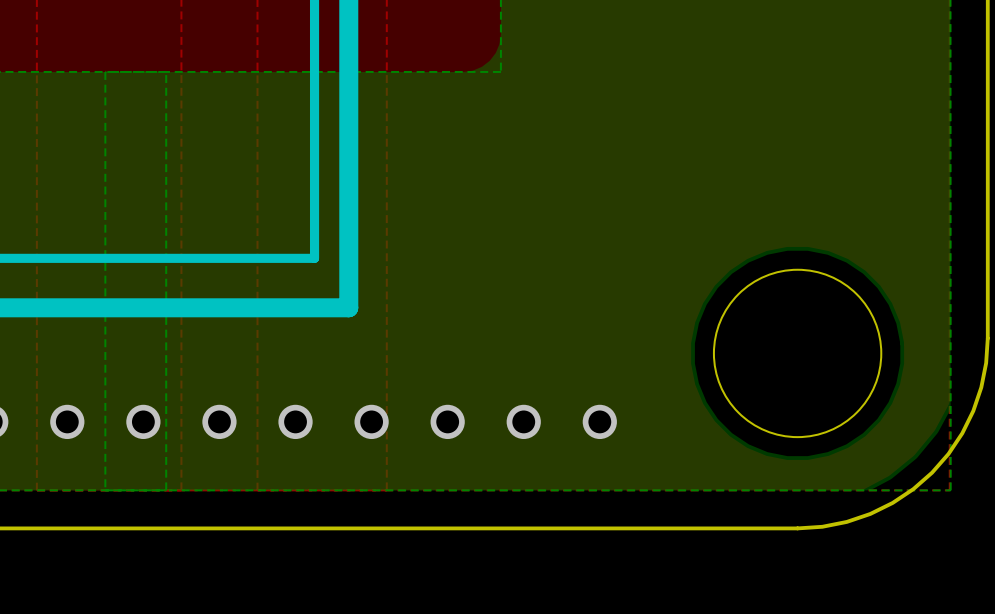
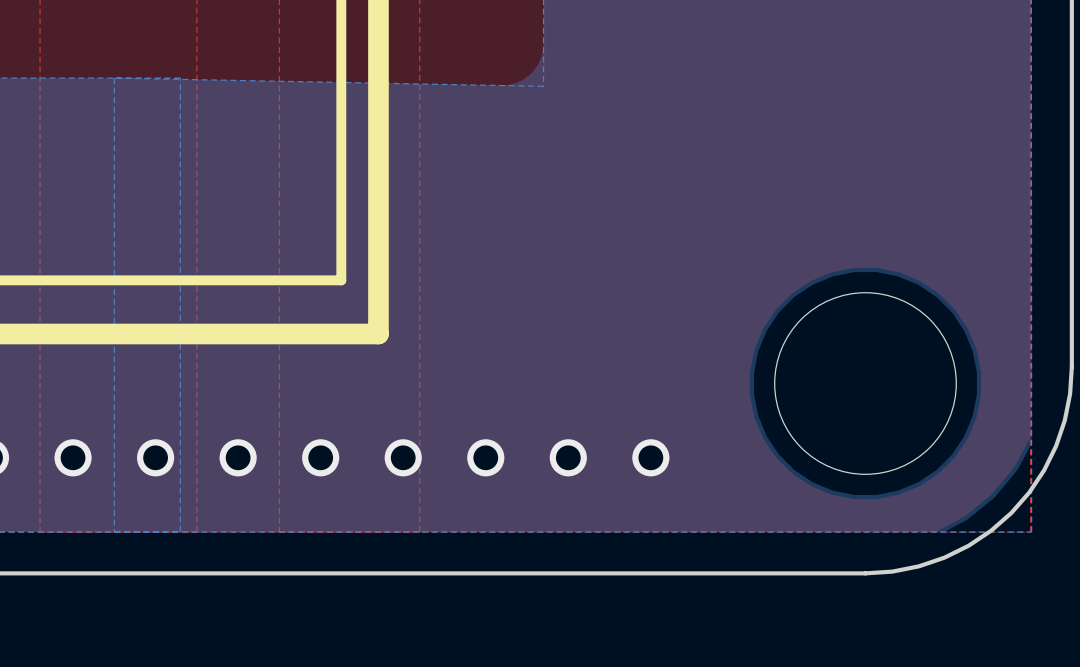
bottom zone outline: (500, 71) (166, 71) -> (543, 78) (543, 86) (114, 78)

